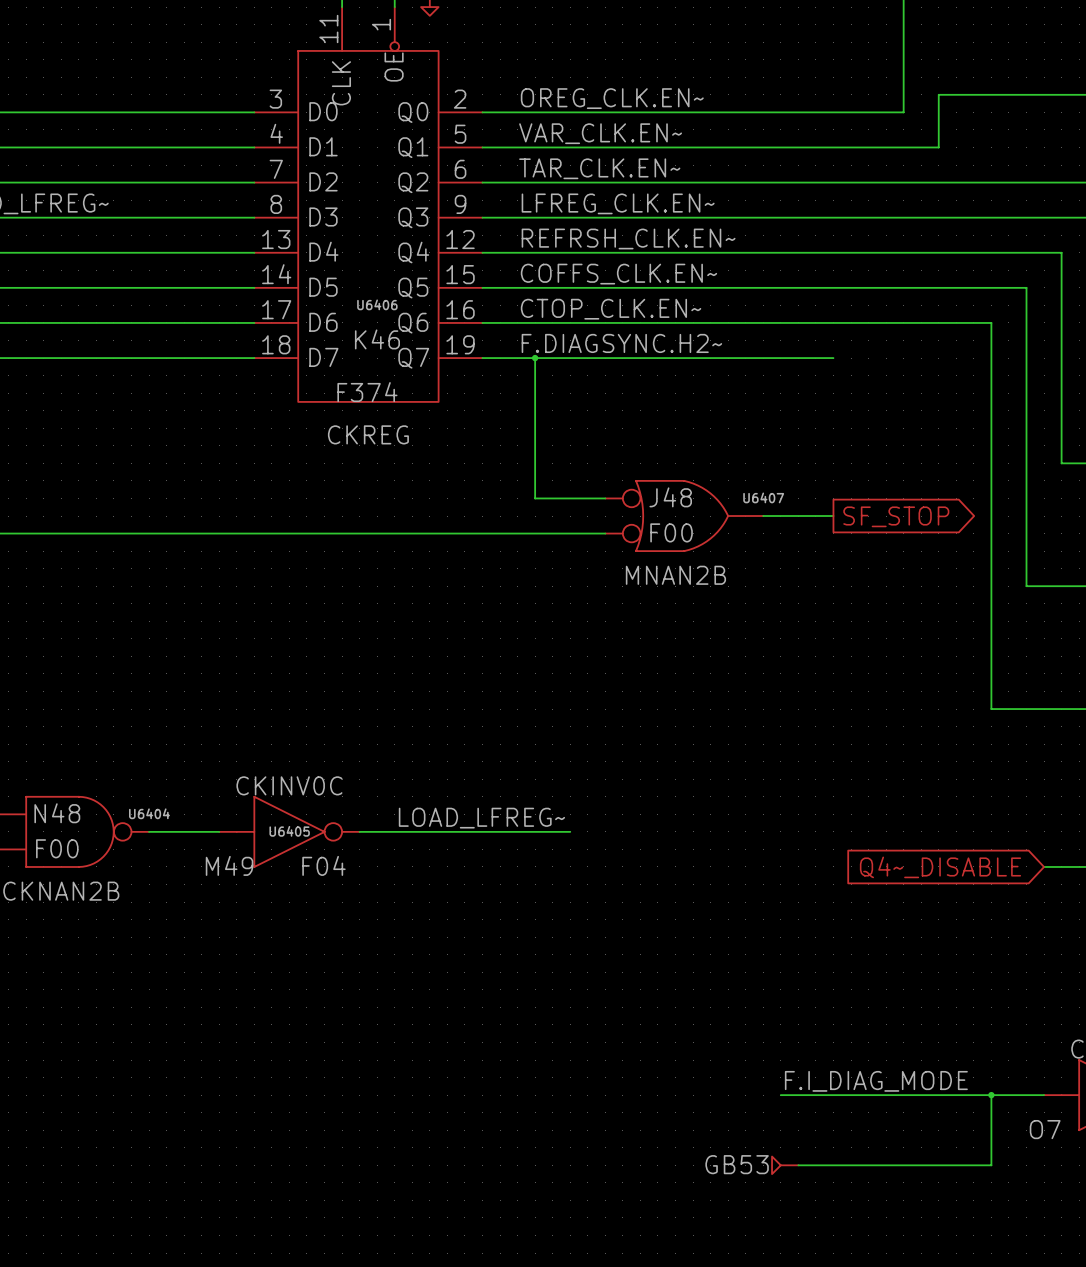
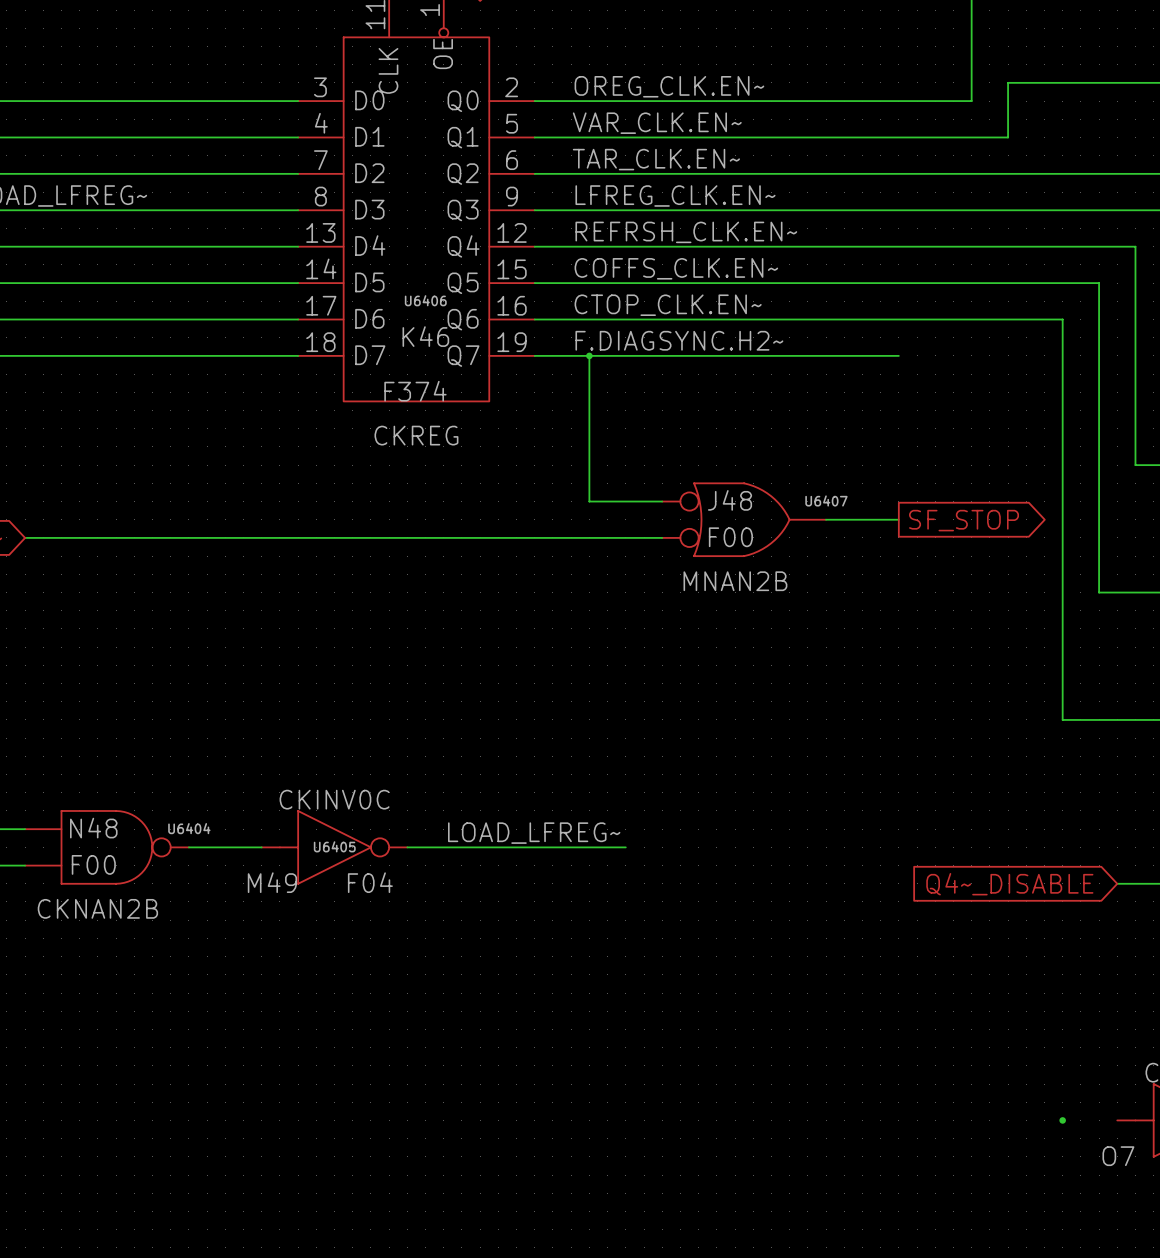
label: F.I_DIAG_MODE (876, 1081) -> none
wire: (780, 1095) (1044, 1095) -> none
wire: (991, 1095) (991, 1165) (798, 1165) -> none
GB53: (784, 1165) -> none

